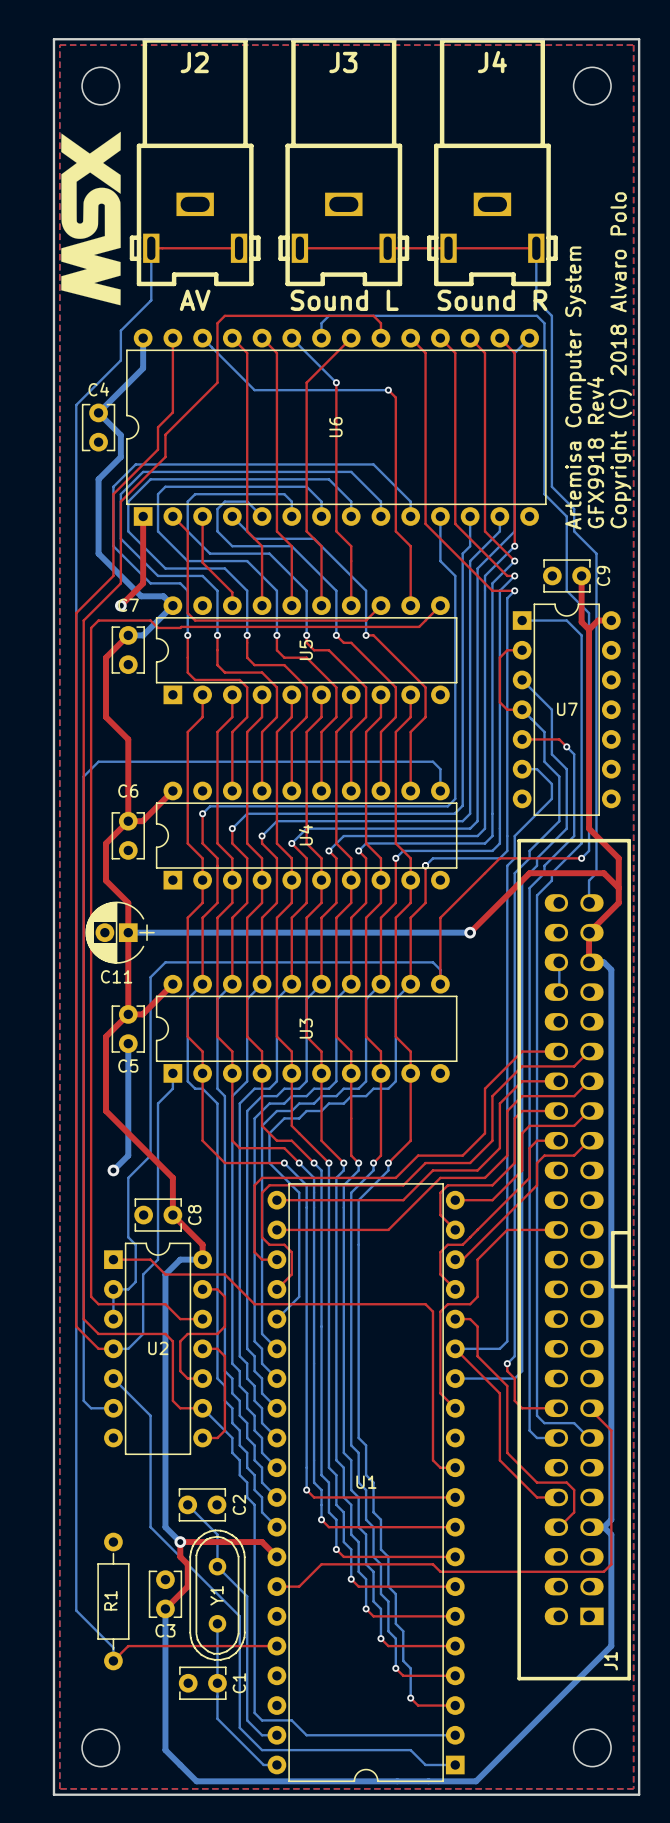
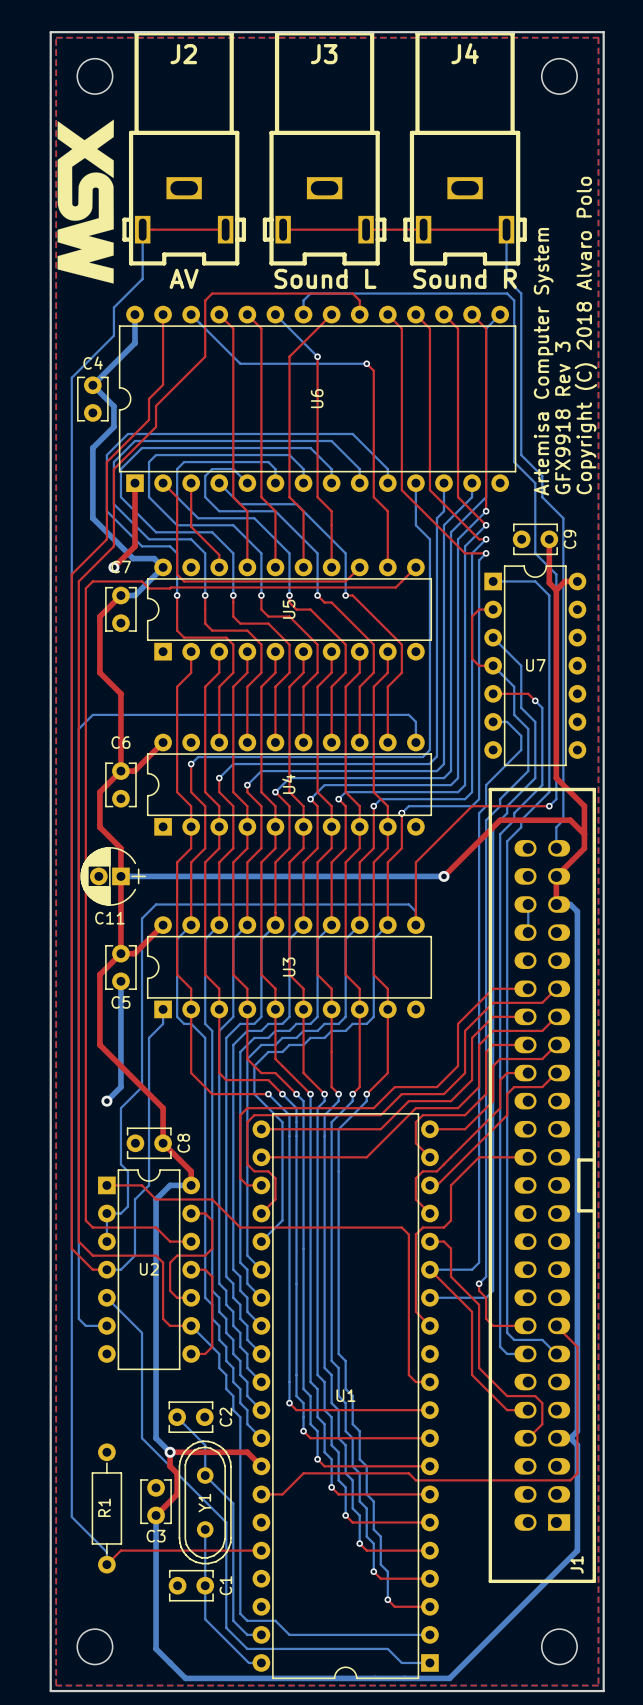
text: GFX9918 Rev4 (595, 452) -> GFX9918 Rev 3 (562, 418)

